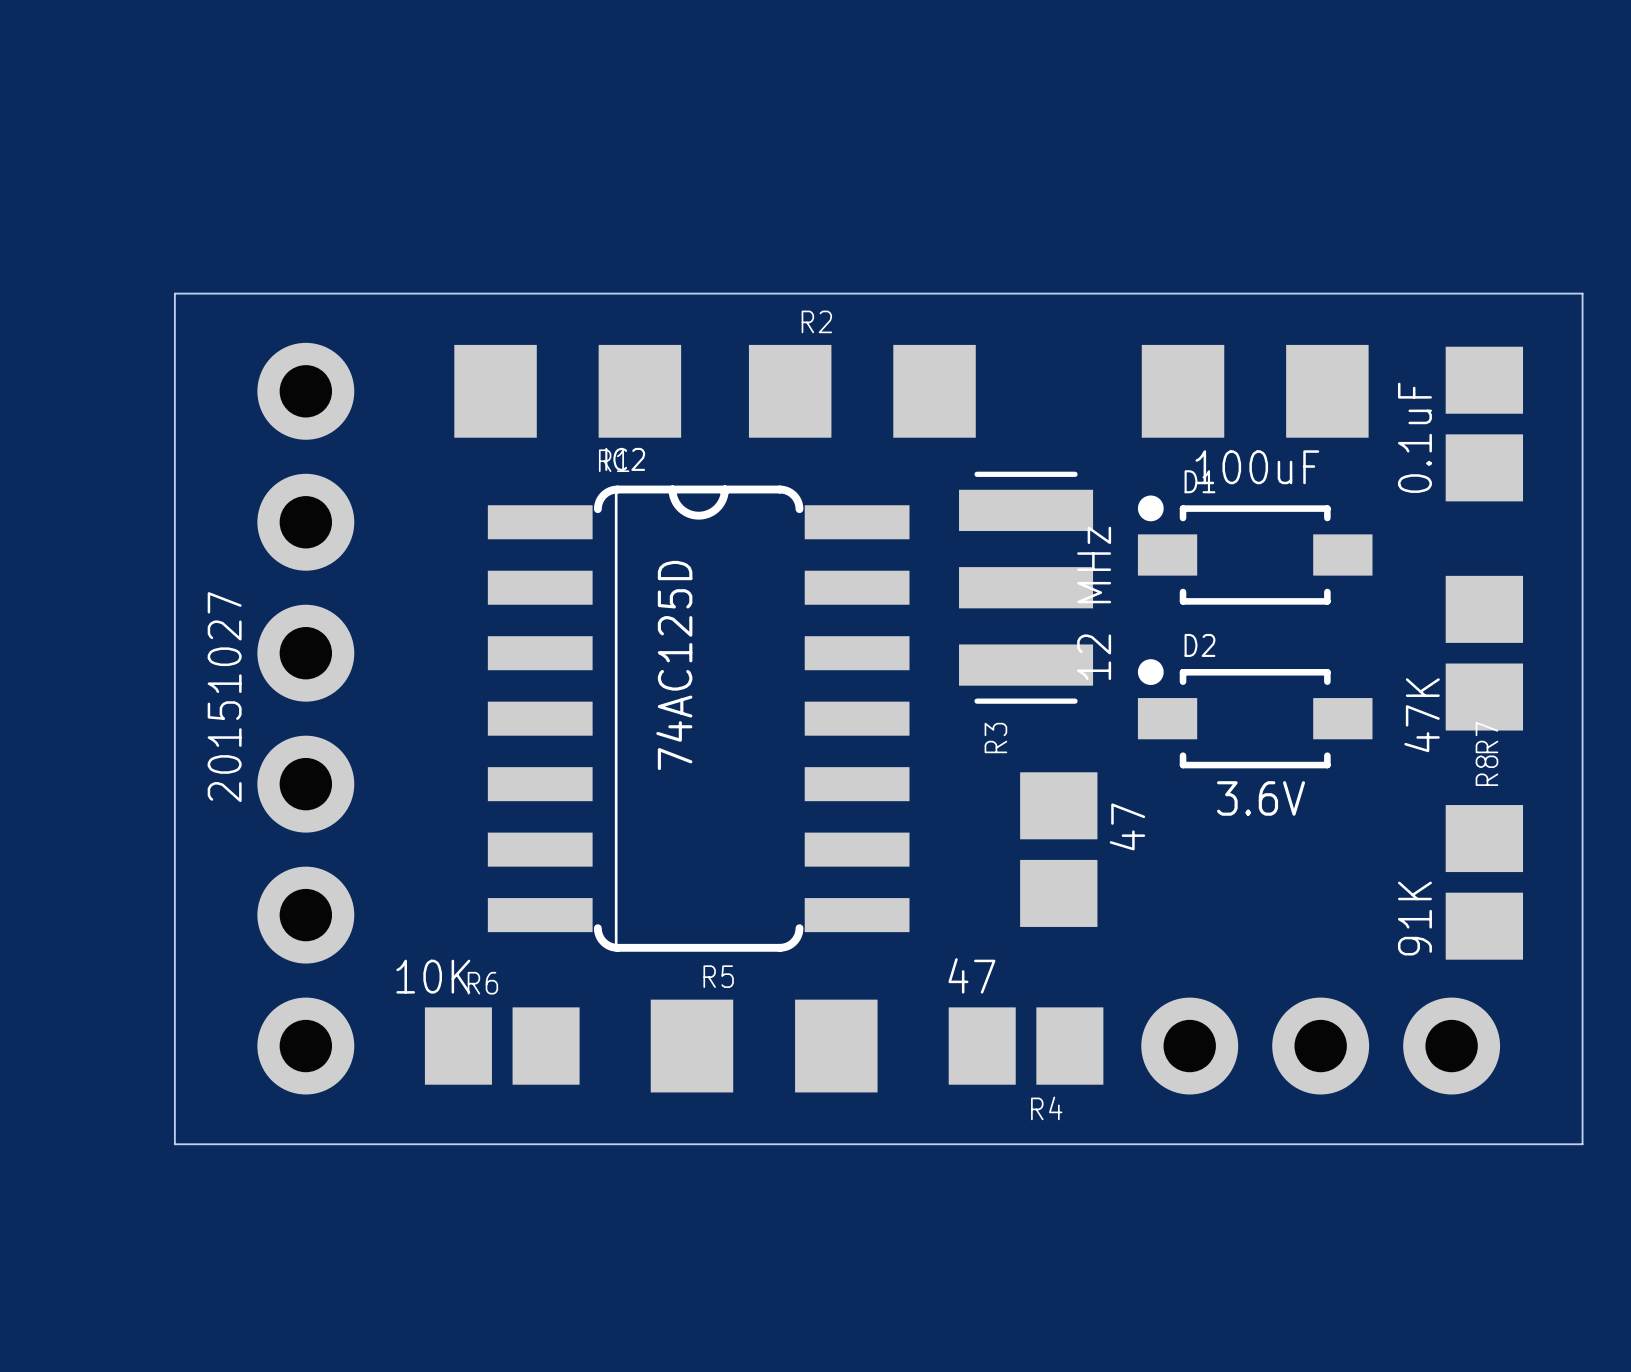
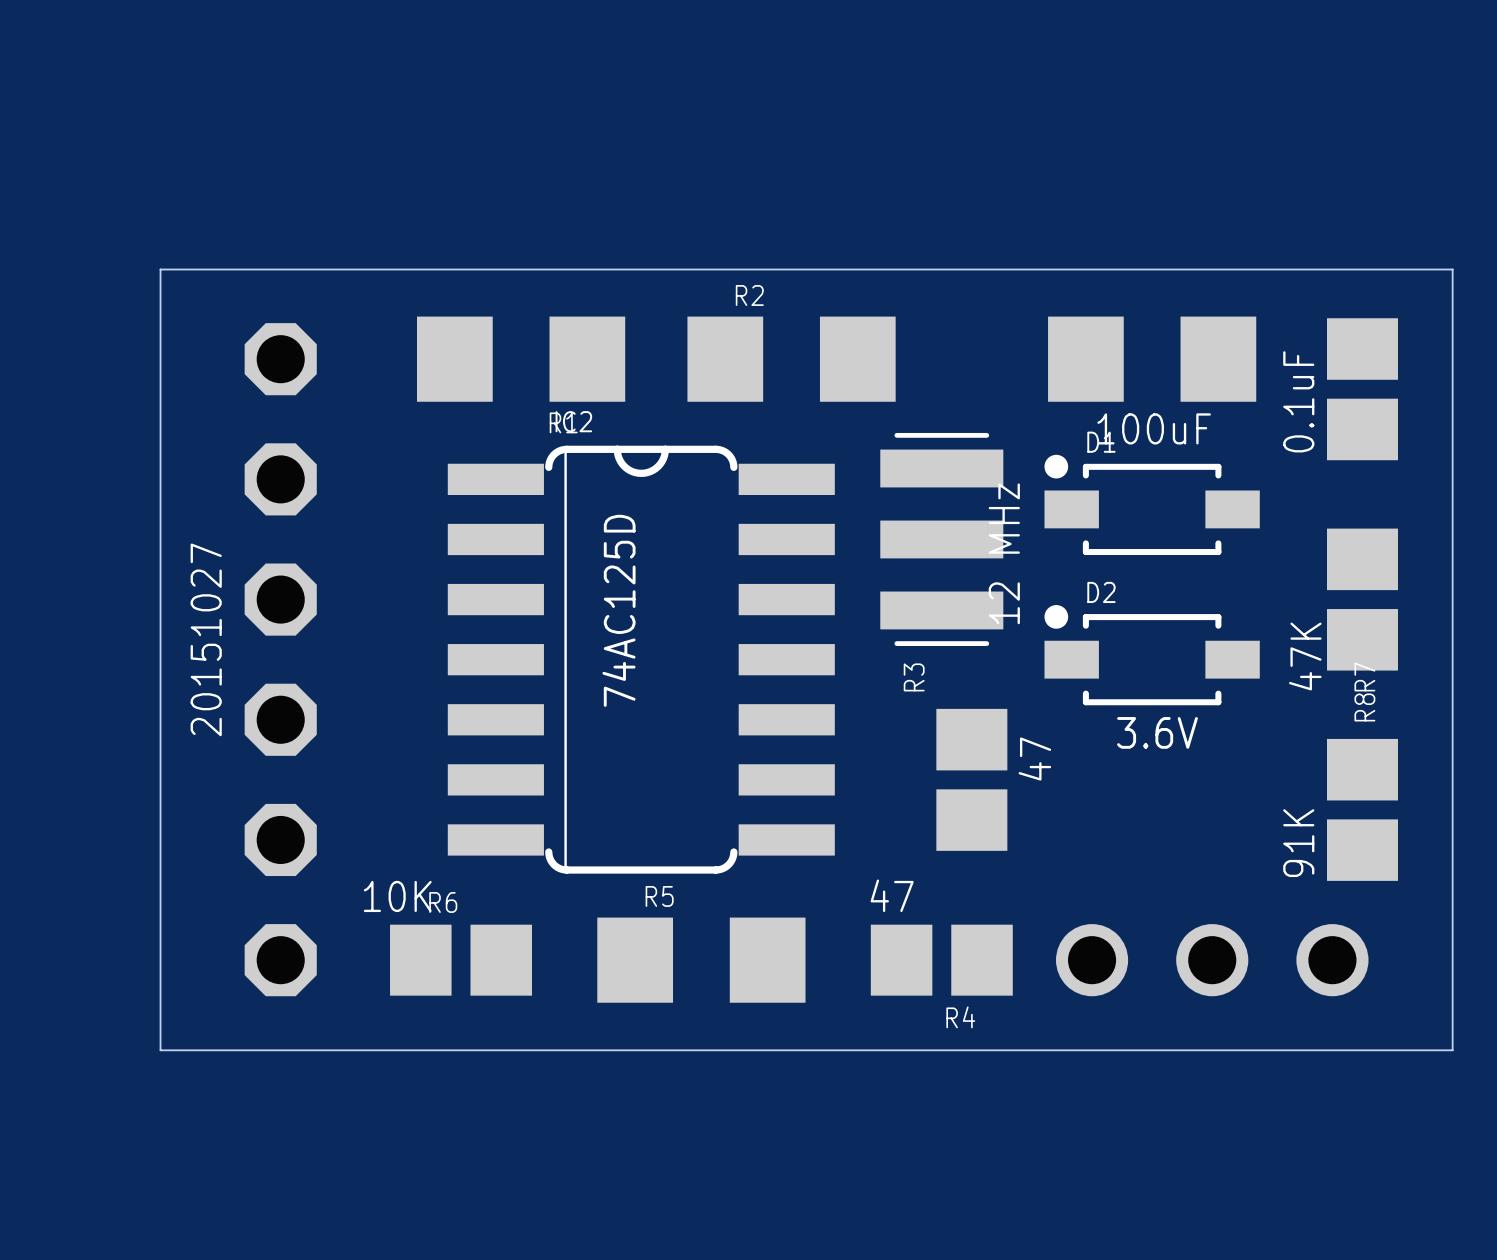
part footprint: [257, 342, 355, 1095] -> [244, 323, 317, 997]
part footprint: [1141, 997, 1501, 1095] -> [1055, 924, 1369, 997]

